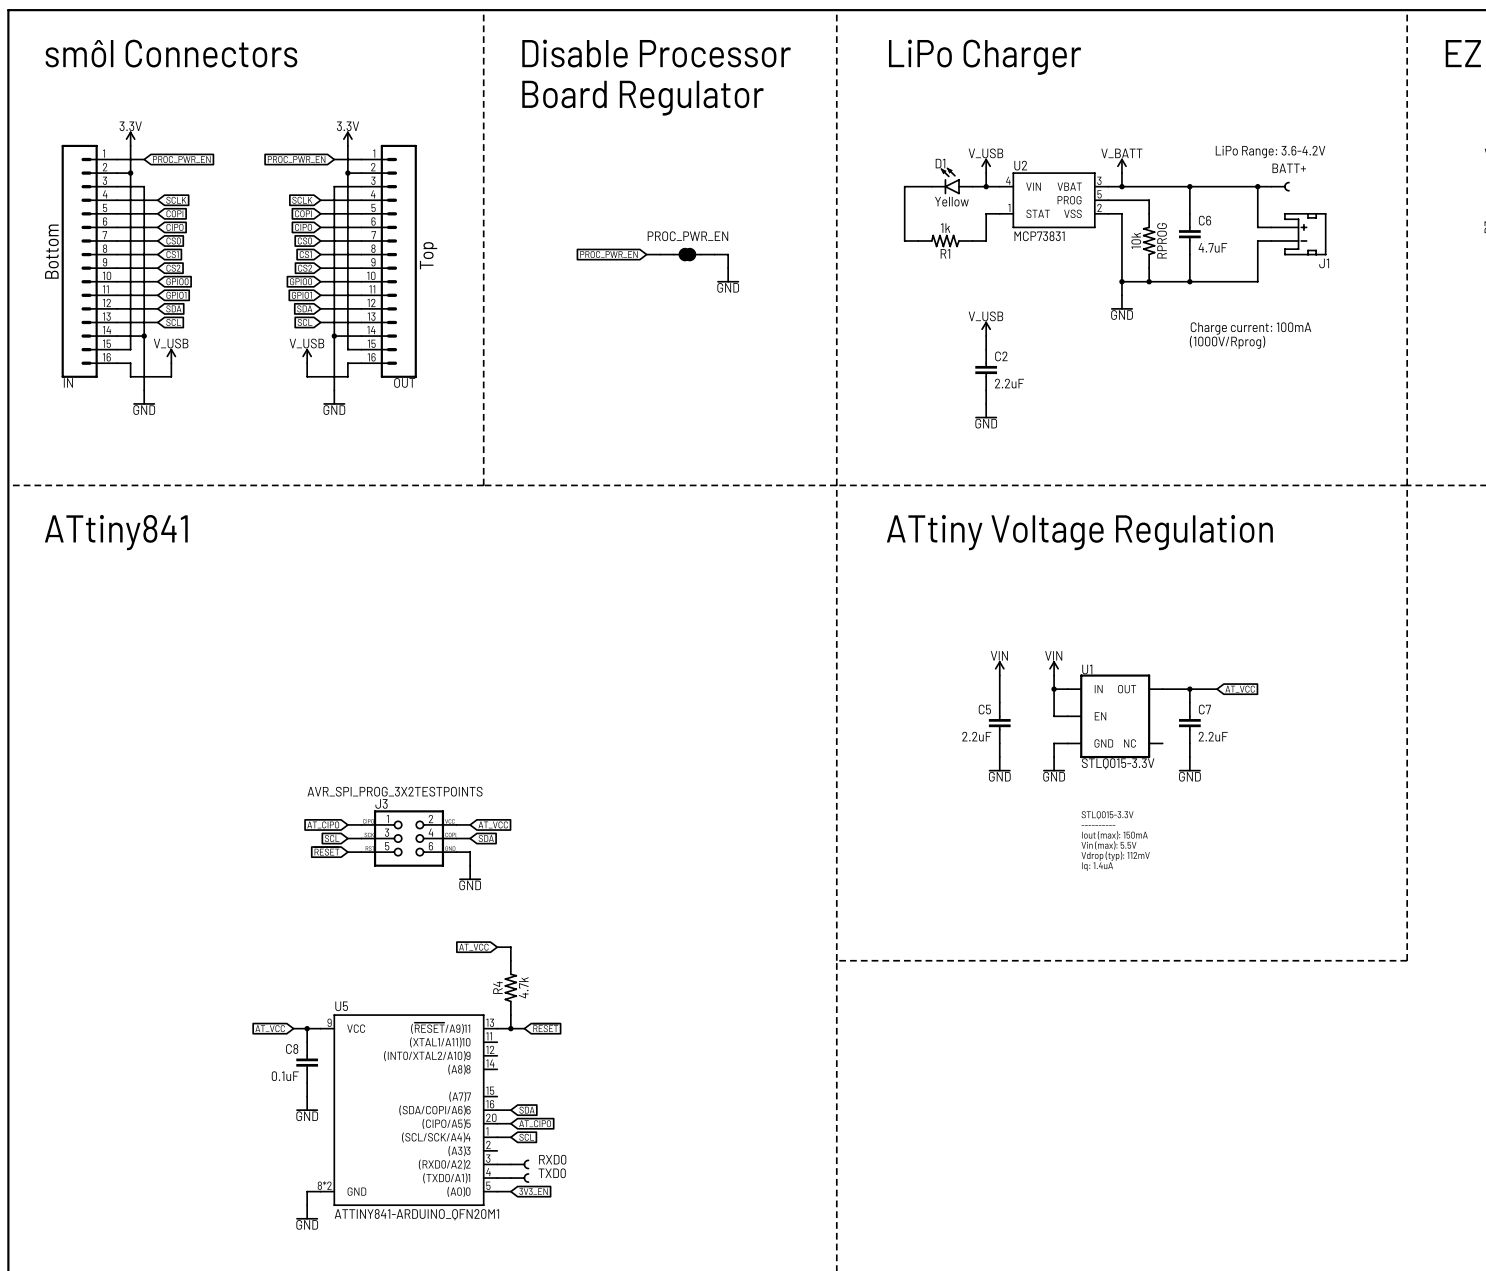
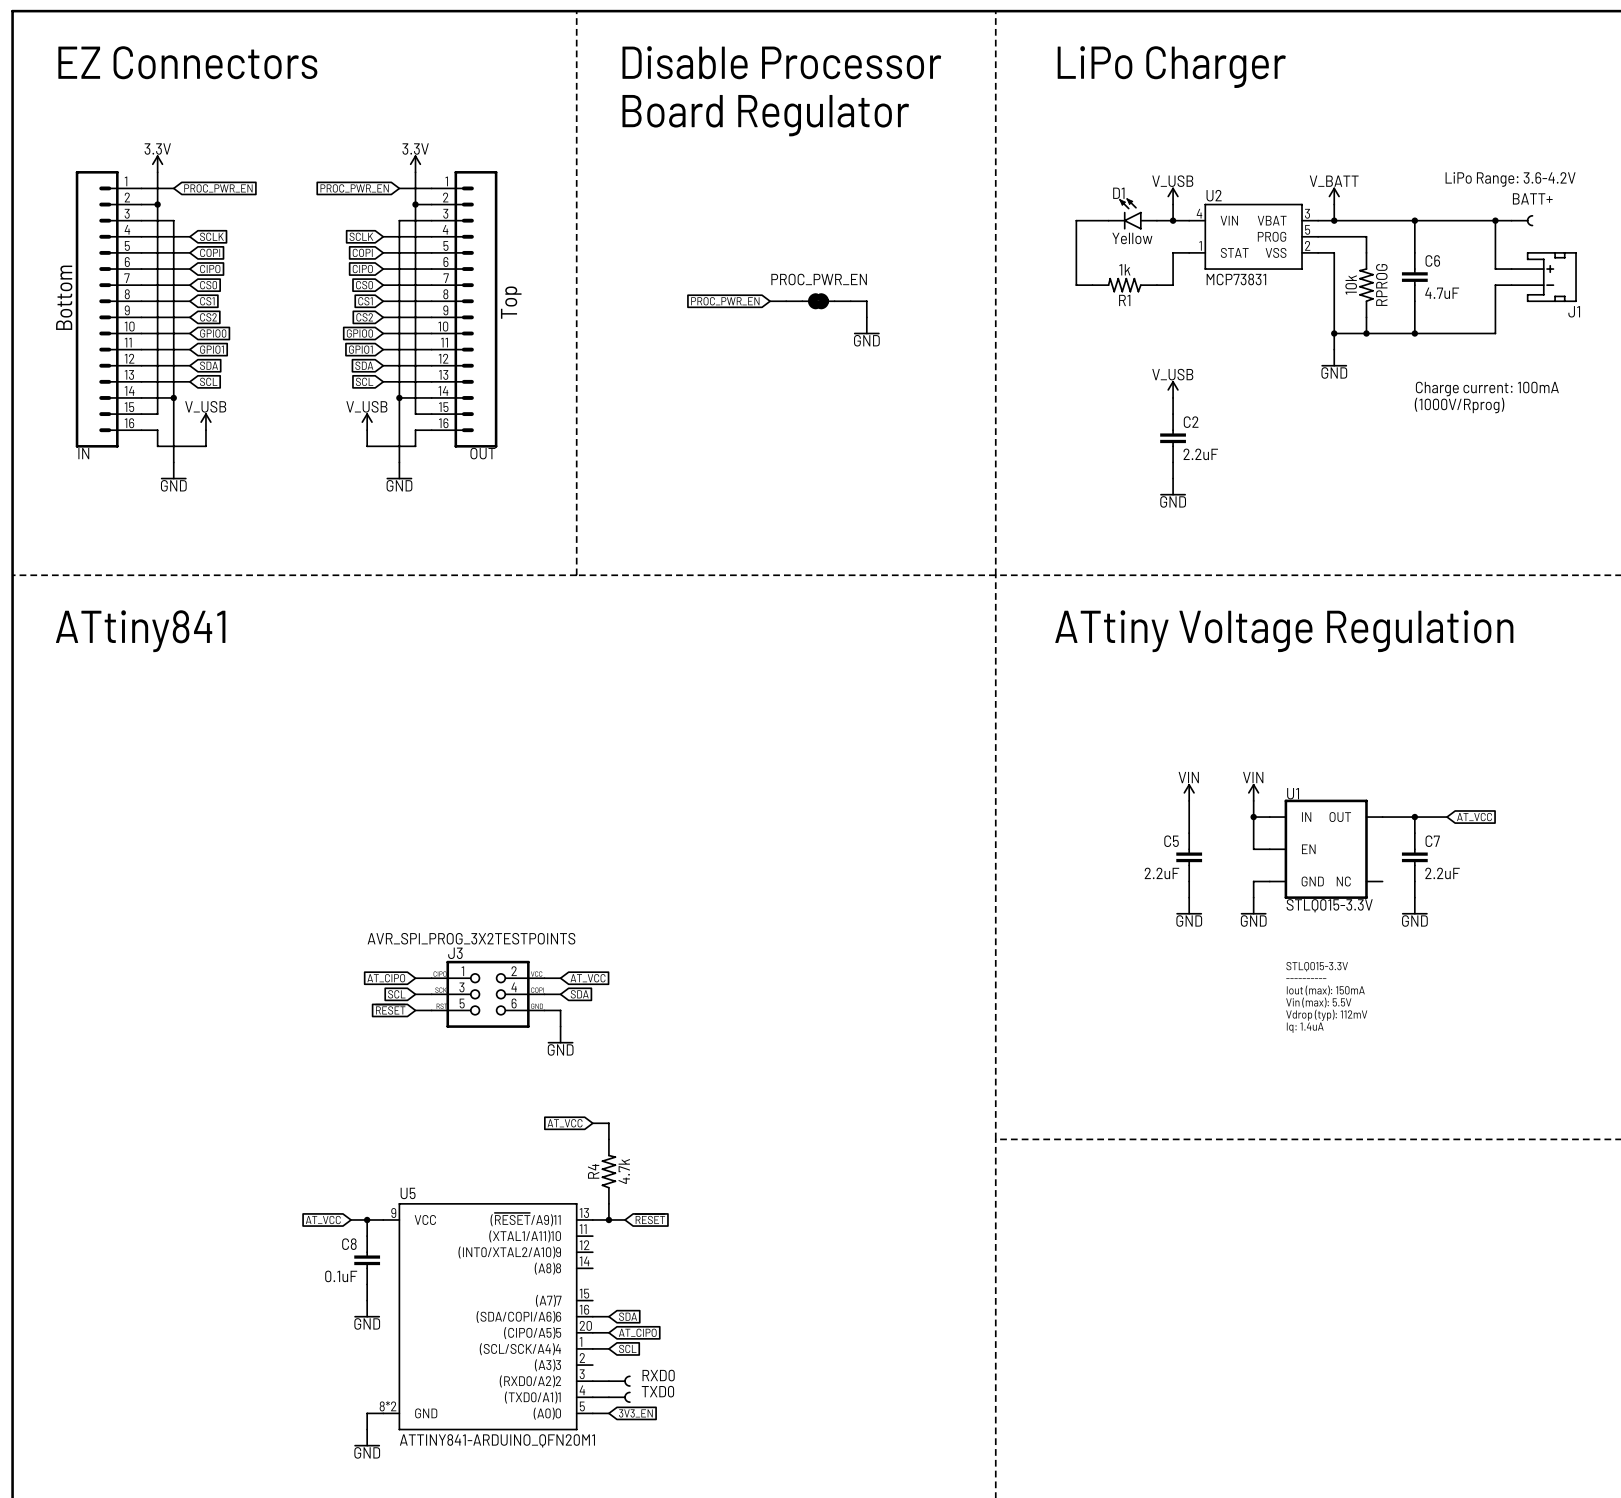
text: smôl Connectors (171, 53) -> EZ Connectors (187, 62)

